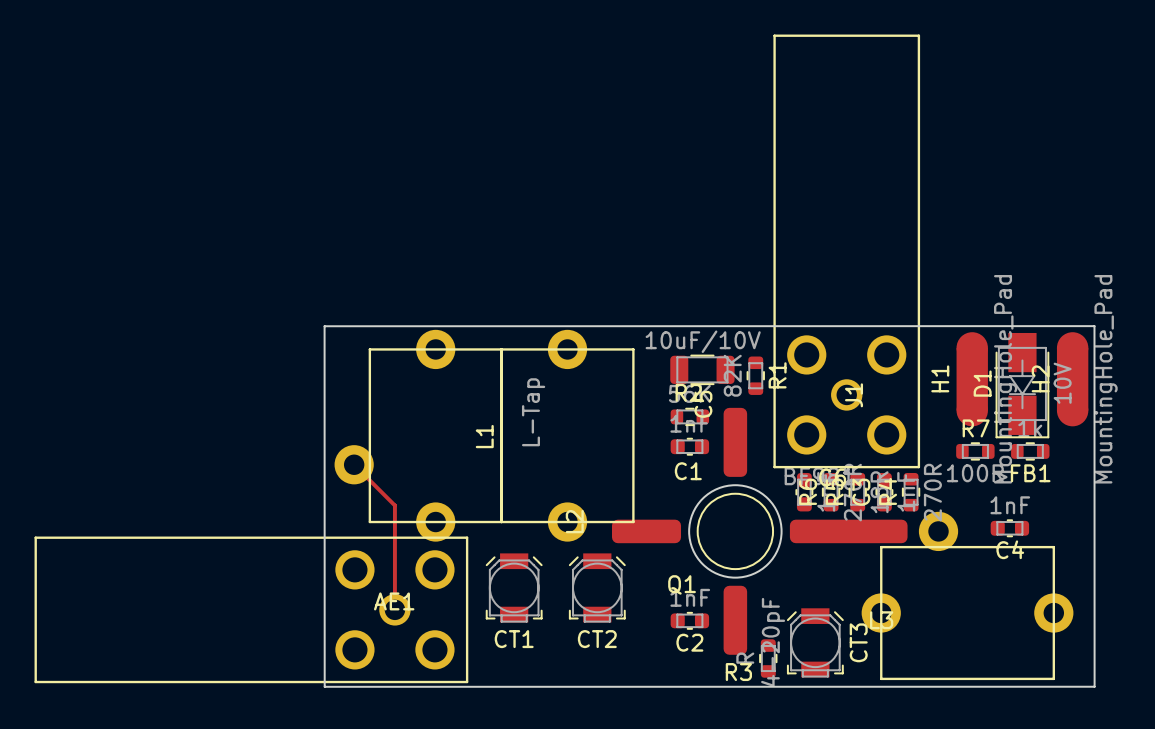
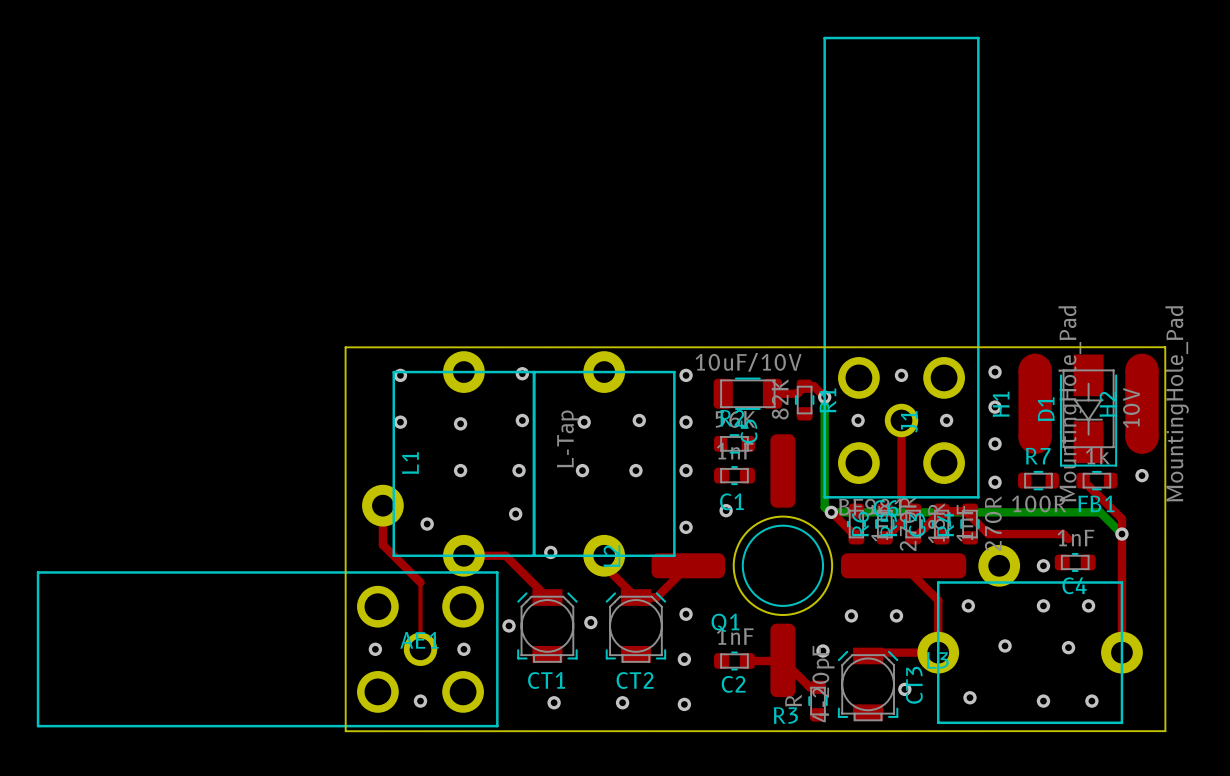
L1 footprint: [334, 329, 503, 542] -> [362, 351, 536, 577]
via: none -> (995, 372)
via: none -> (522, 373)
via: none -> (400, 375)
via: none -> (686, 375)
via: none -> (901, 375)
top track: none -> (772, 393) (797, 393) (804, 386) (813, 386) (824, 397)
bottom track: none -> (824, 397) (824, 507) (831, 512) (1100, 512) (1121, 534)
via: none -> (824, 397)
via: none -> (995, 407)
via: none -> (522, 420)
via: none -> (639, 420)
via: none -> (858, 420)
top track: none -> (901, 420) (901, 498) (913, 510) (884, 537)
via: none -> (946, 420)
via: none -> (400, 422)
via: none -> (584, 422)
via: none -> (686, 422)
via: none -> (460, 423)
via: none -> (995, 443)
L1 name position: L1 (484, 436) -> L1 (410, 463)
via: none -> (460, 470)
via: none -> (519, 470)
via: none -> (582, 470)
via: none -> (635, 470)
via: none -> (686, 470)
via: none -> (1142, 475)
top track: none -> (1083, 480) (1121, 519) (1121, 652)
via: none -> (995, 482)
top track: (354, 464) (394, 505) (394, 547) -> (382, 505) (382, 544) (420, 582)
via: none -> (726, 510)
top track: none -> (831, 512) (856, 536)
via: none -> (831, 512)
via: none -> (515, 514)
via: none -> (427, 524)
via: none -> (686, 527)
via: none -> (1121, 534)
top track: none -> (913, 537) (941, 511) (965, 511) (988, 534) (1063, 534) (1068, 539)
via: none -> (550, 552)
top track: none -> (463, 555) (505, 555) (547, 597)
top track: none -> (604, 555) (604, 565) (635, 597) (656, 597) (688, 565)
top track: none -> (903, 565) (938, 600) (938, 652) (871, 652) (868, 655)
via: none -> (1043, 565)
via: none -> (968, 605)
via: none -> (1043, 605)
via: none -> (1088, 605)
via: none -> (686, 614)
via: none -> (851, 615)
via: none -> (896, 615)
via: none -> (590, 622)
via: none -> (509, 625)
via: none -> (1005, 645)
via: none -> (1068, 647)
via: none -> (375, 649)
via: none -> (463, 649)
via: none -> (823, 650)
via: none -> (684, 659)
top track: none -> (747, 661) (782, 660) (809, 687) (817, 687)
via: none -> (904, 689)
via: none -> (969, 697)
via: none -> (420, 701)
via: none -> (1043, 701)
via: none -> (1091, 701)
via: none -> (554, 702)
via: none -> (622, 702)
via: none -> (684, 704)

